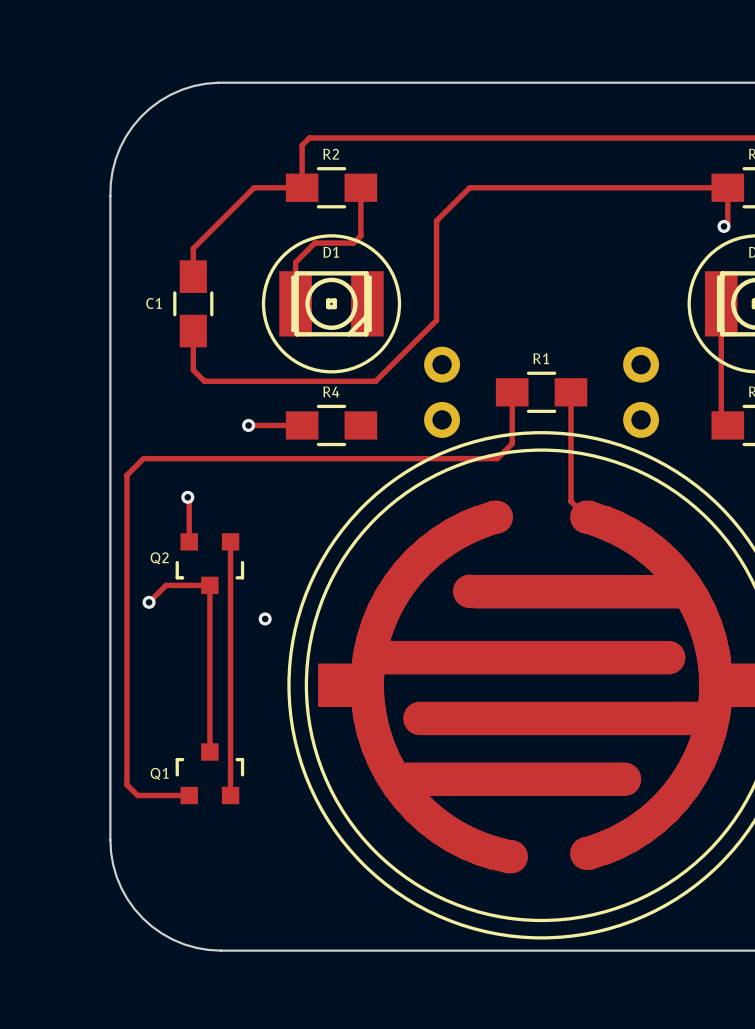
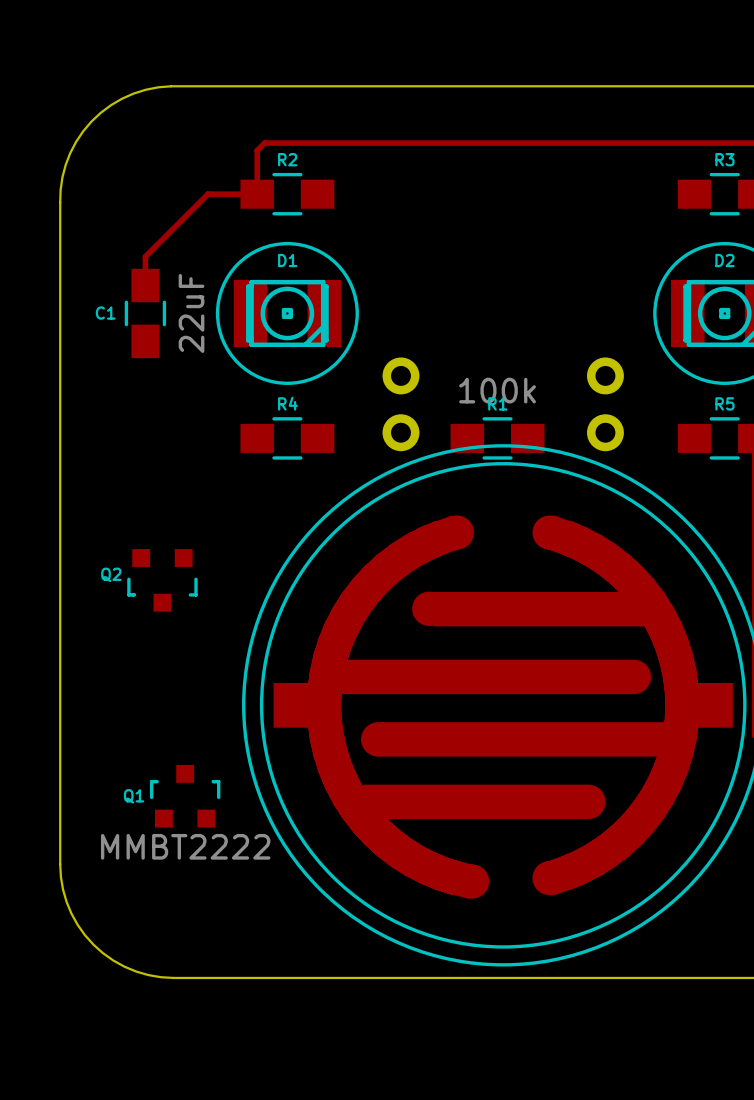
track: (360, 187) (360, 235) (353, 243) (314, 243) (295, 262) (295, 303) -> none
track: (724, 226) (727, 222) (727, 187) (469, 187) (436, 220) (436, 320) (375, 381) (204, 381) (193, 370) (193, 331) -> none
via: (724, 226) -> none
C1 value: none -> 22uF (191, 313)
track: (721, 303) (721, 418) (727, 425) -> none
R1 value: none -> 100k (497, 390)
track: (512, 392) (512, 443) (497, 458) (143, 458) (126, 475) (126, 784) (137, 795) (189, 795) -> none
R1 position: (541, 392) -> (497, 438)
track: (570, 392) (570, 501) (586, 517) -> none
track: (248, 425) (302, 425) -> none
via: (248, 425) -> none
track: (187, 497) (189, 541) -> none
via: (187, 497) -> none
track: (230, 541) (230, 795) -> none
track: (149, 602) (166, 585) (209, 585) (209, 752) -> none
via: (149, 602) -> none
via: (265, 618) -> none
Q1 position: (209, 773) -> (185, 796)
Q1 value: none -> MMBT2222 (185, 846)

